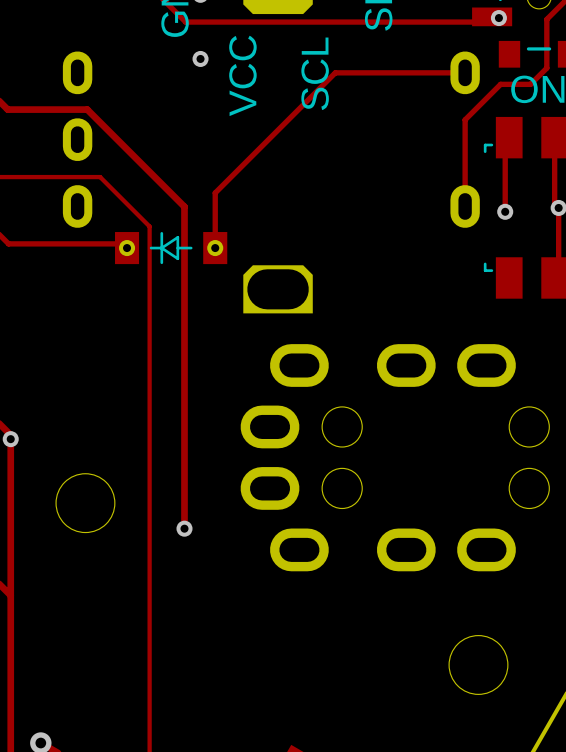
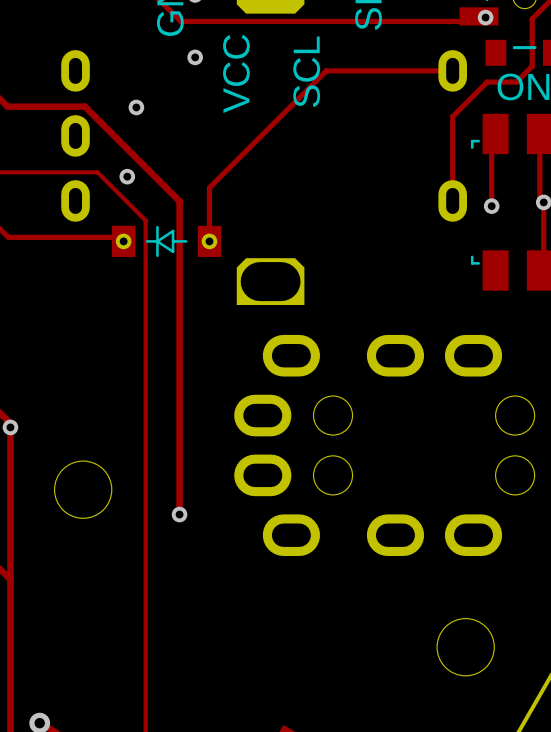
via: none -> (136, 107)
via: none -> (127, 176)

